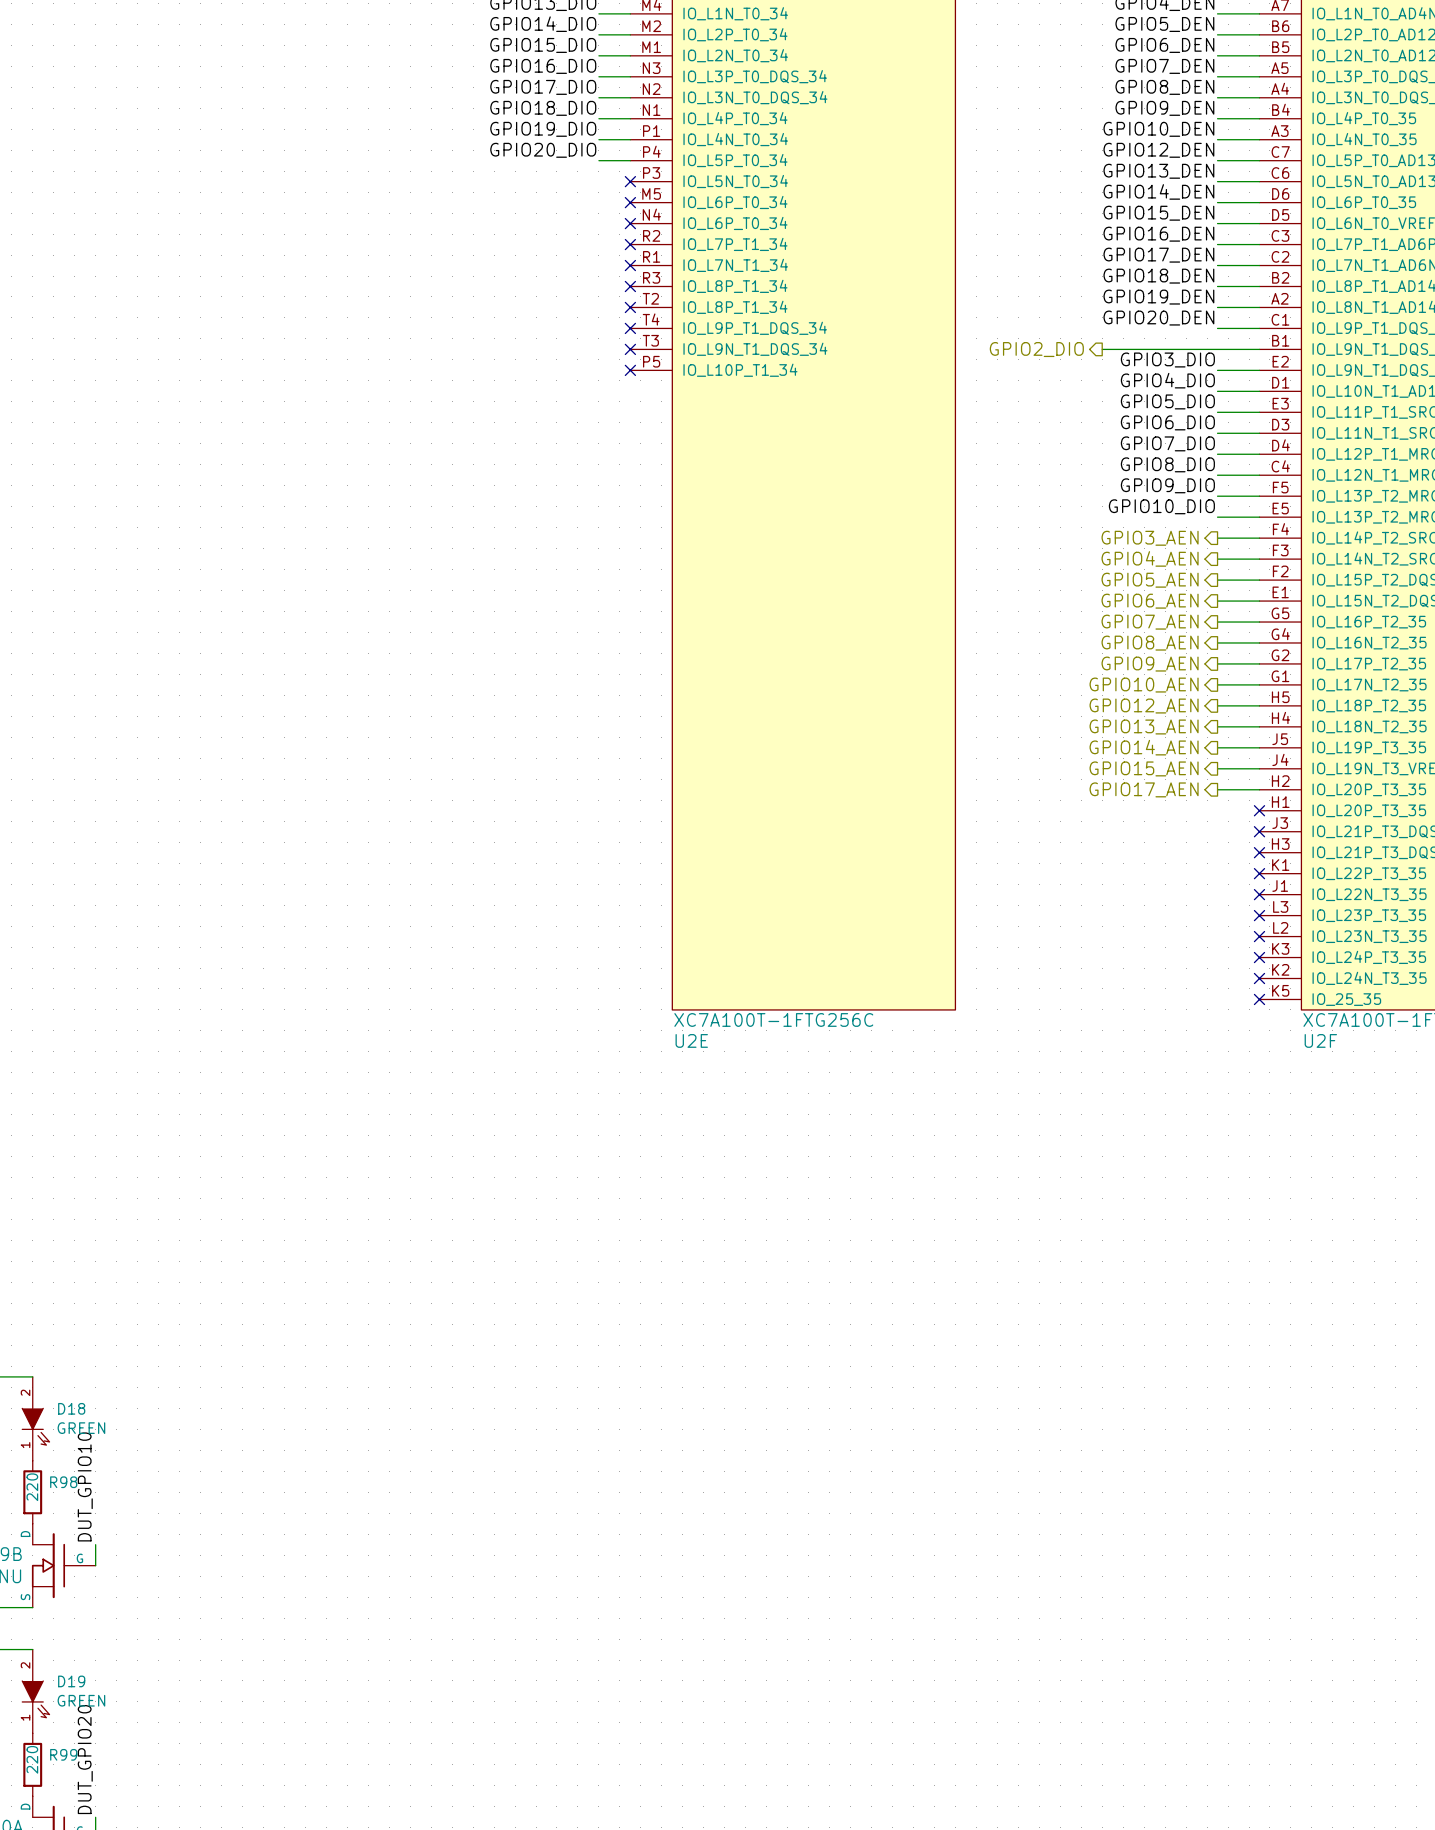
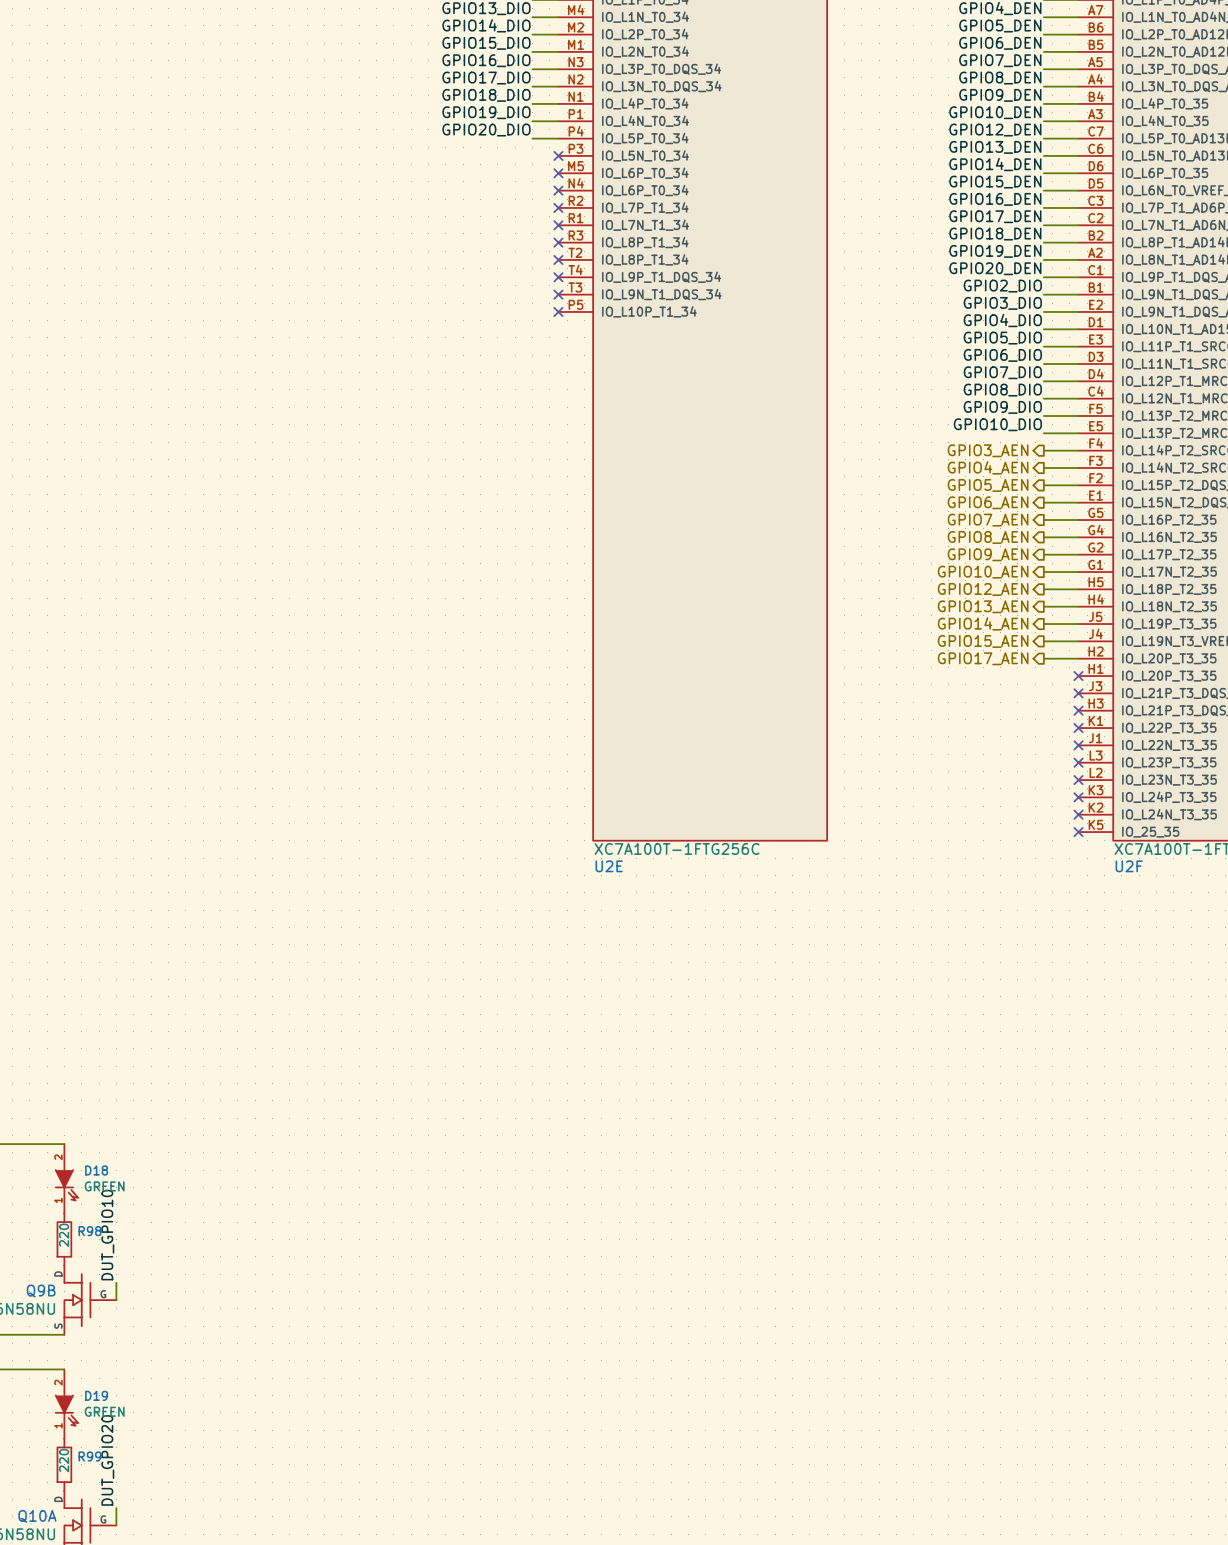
label: none -> GPIO2_DIO (1002, 286)
hierarchical label: GPIO2_DIO (1036, 349) -> none
wire: (1102, 349) (1217, 349) -> none

